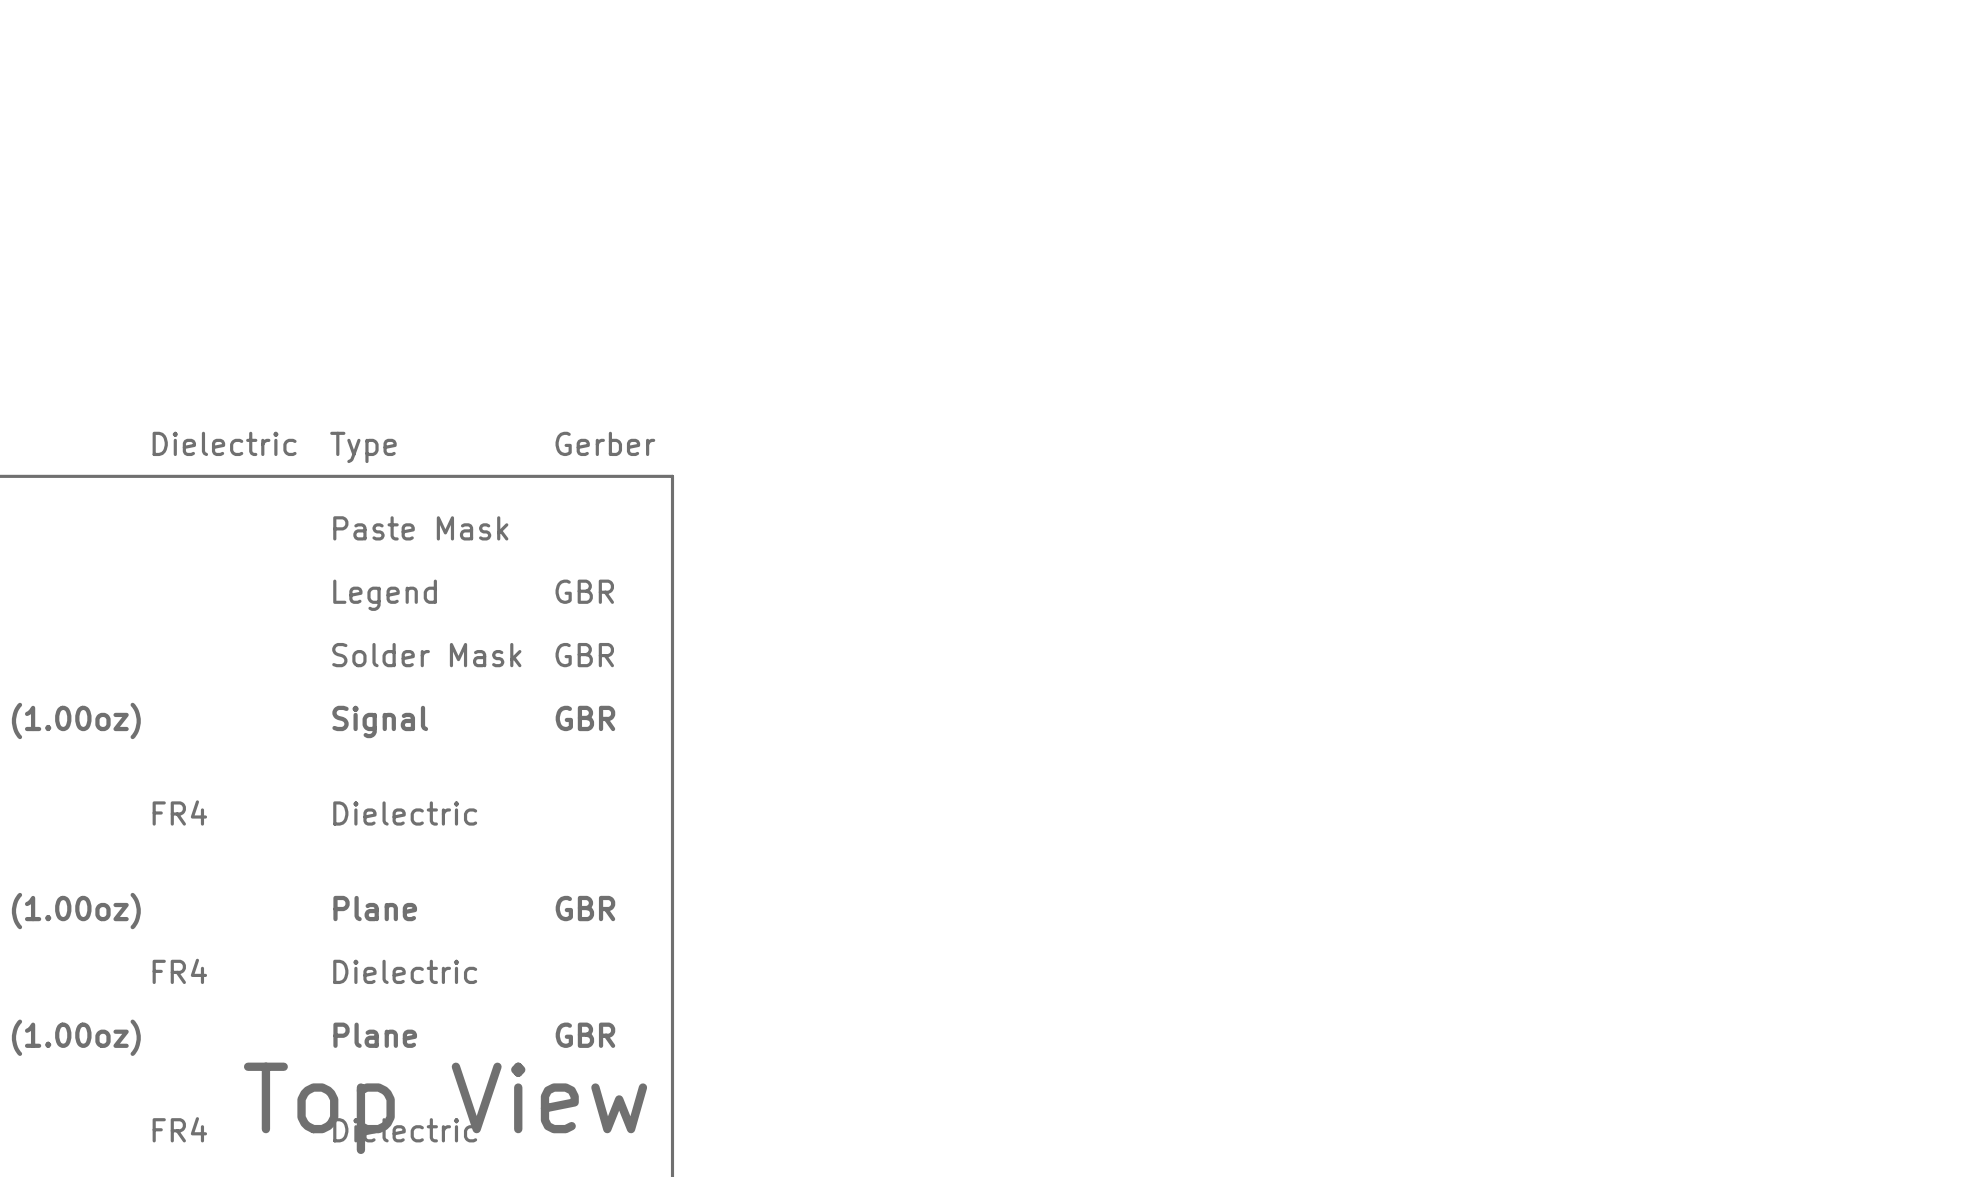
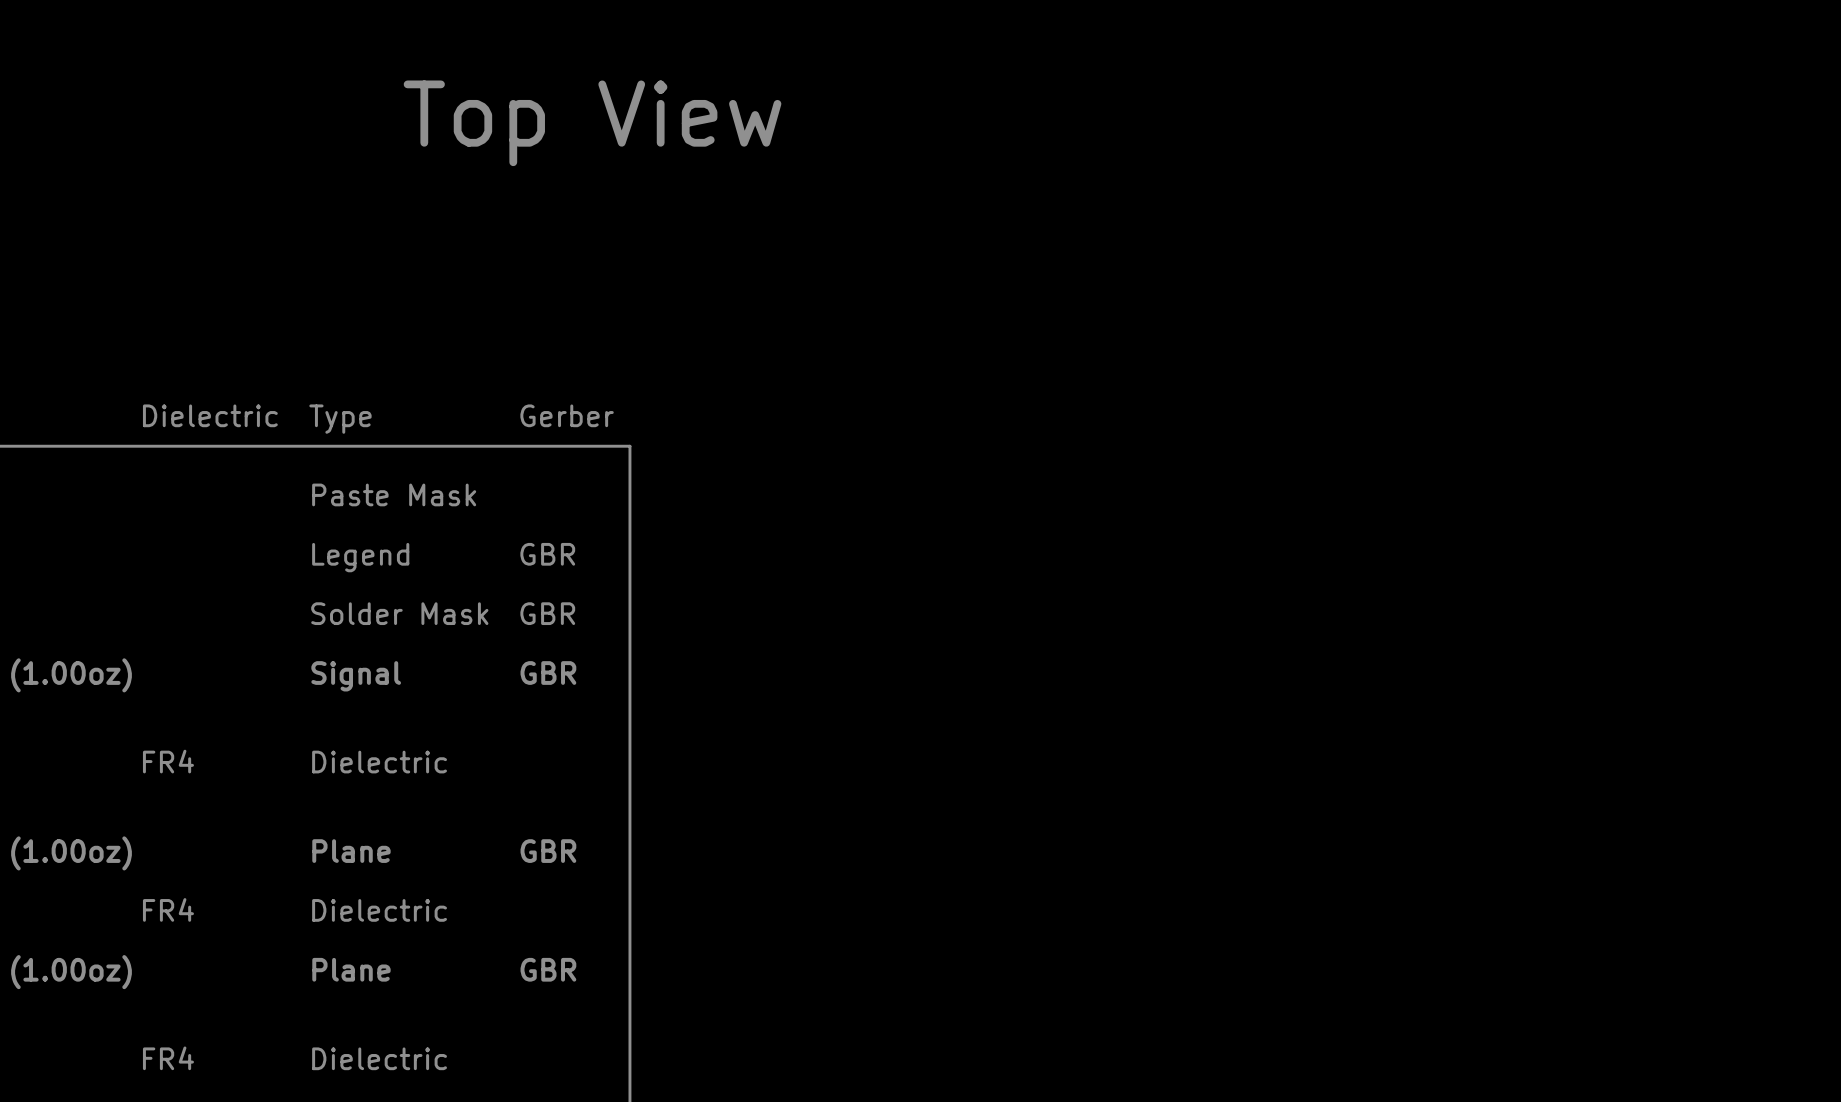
text: none -> Top View (592, 123)
text: Top View (445, 1108) -> none

